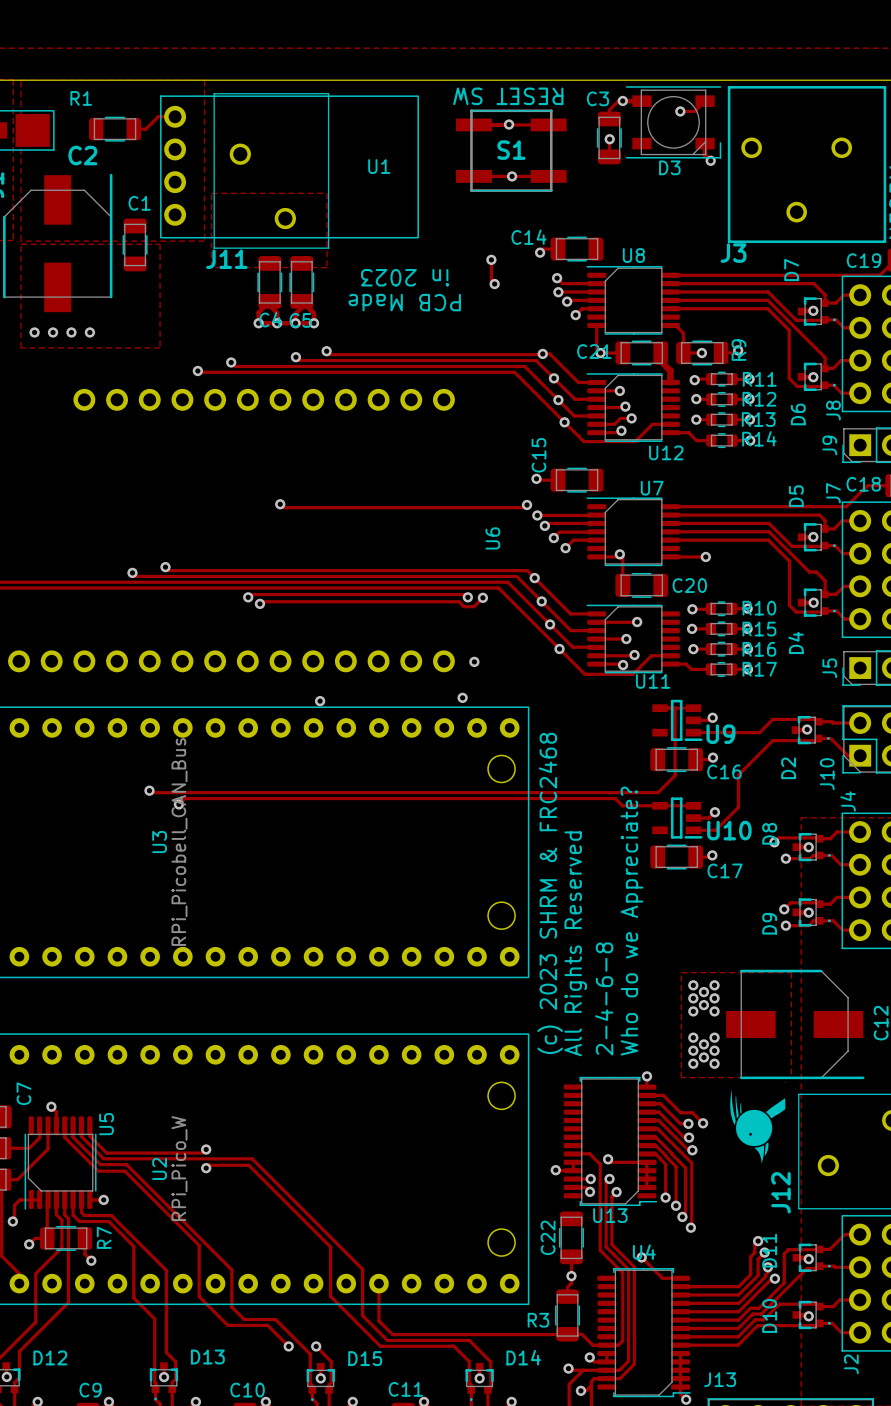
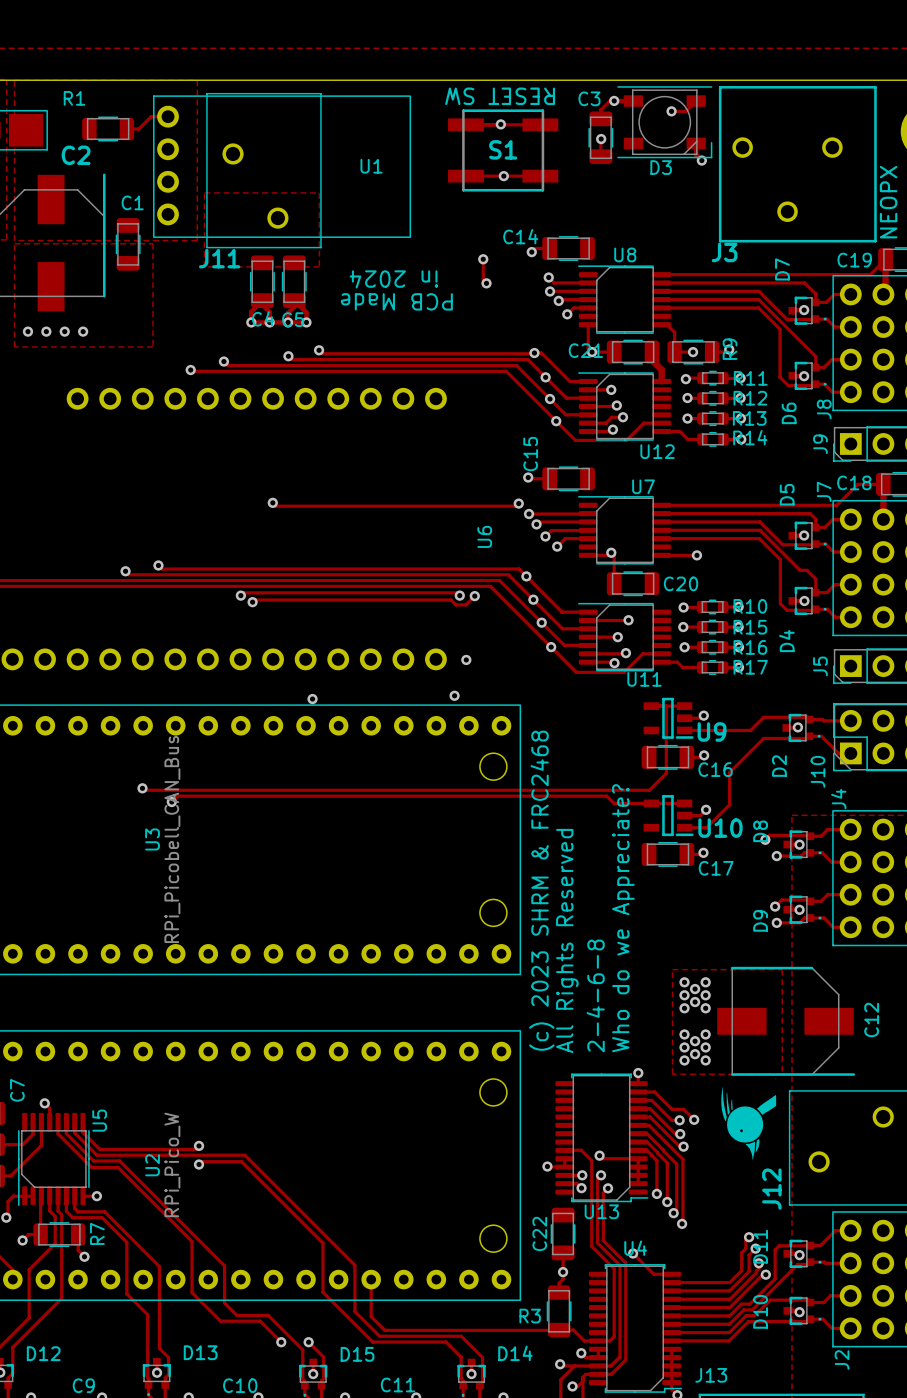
text: in 2023 (405, 277) -> in 2024 (393, 279)

